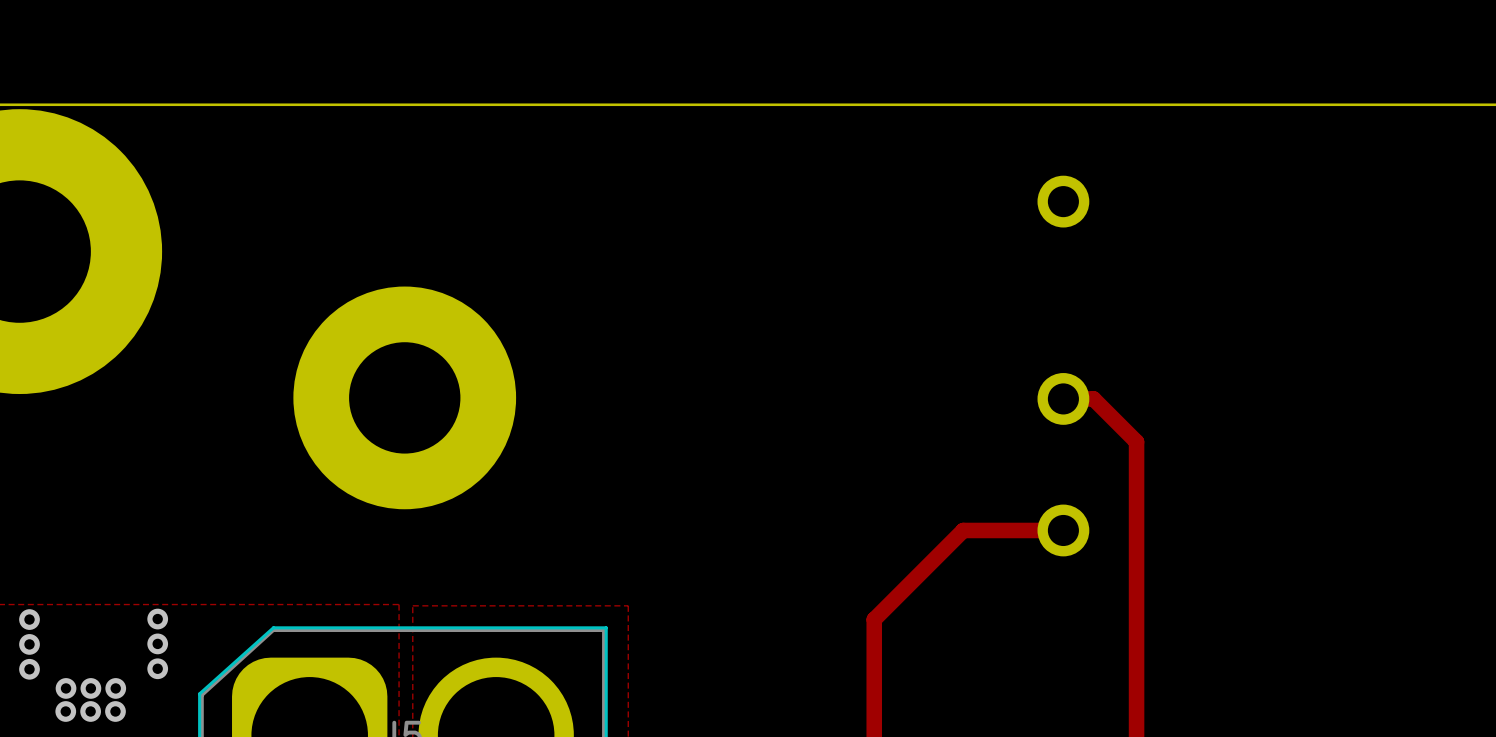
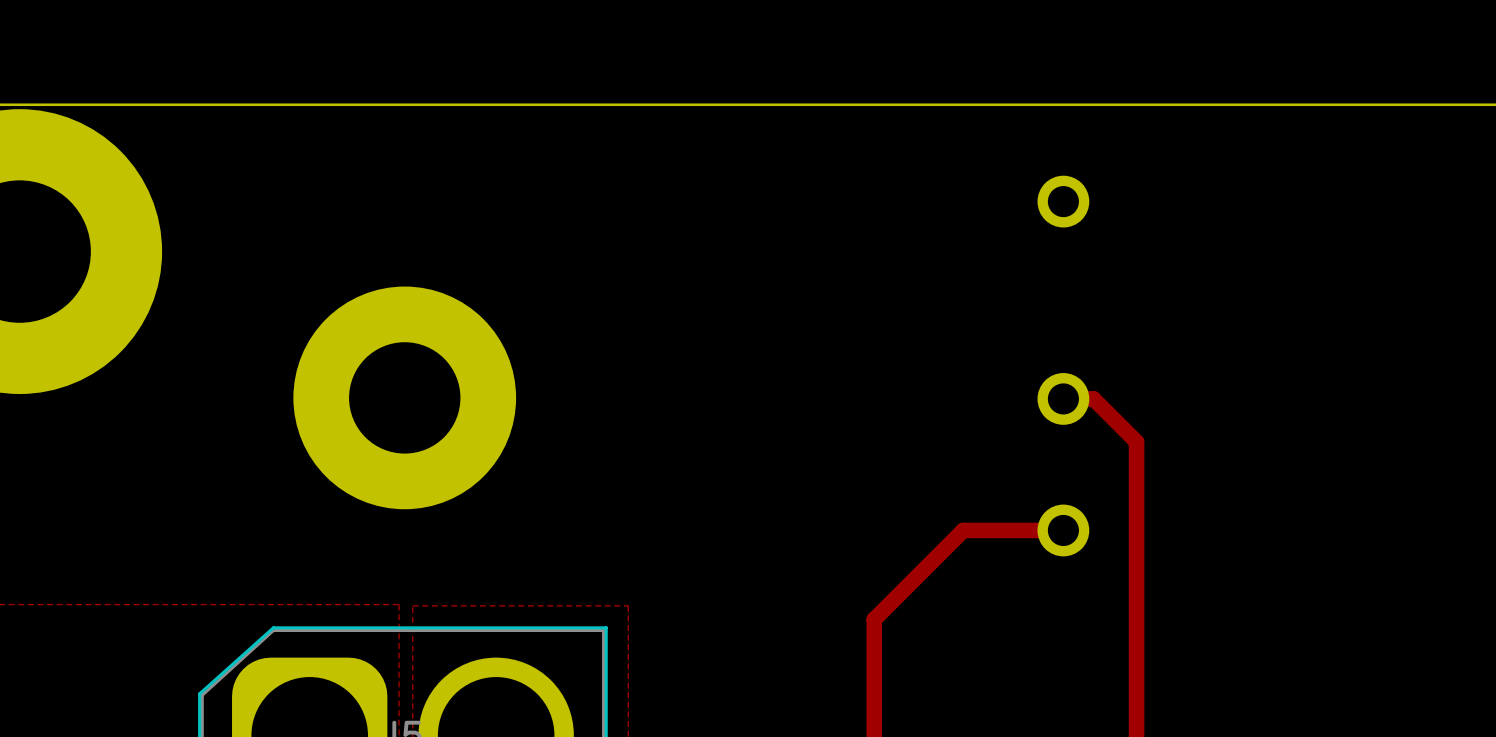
via: (29, 619) -> none
via: (157, 619) -> none
via: (157, 643) -> none
via: (29, 644) -> none
via: (157, 668) -> none
via: (29, 669) -> none
via: (66, 688) -> none
via: (90, 688) -> none
via: (115, 688) -> none
via: (65, 711) -> none
via: (90, 711) -> none
via: (115, 711) -> none

